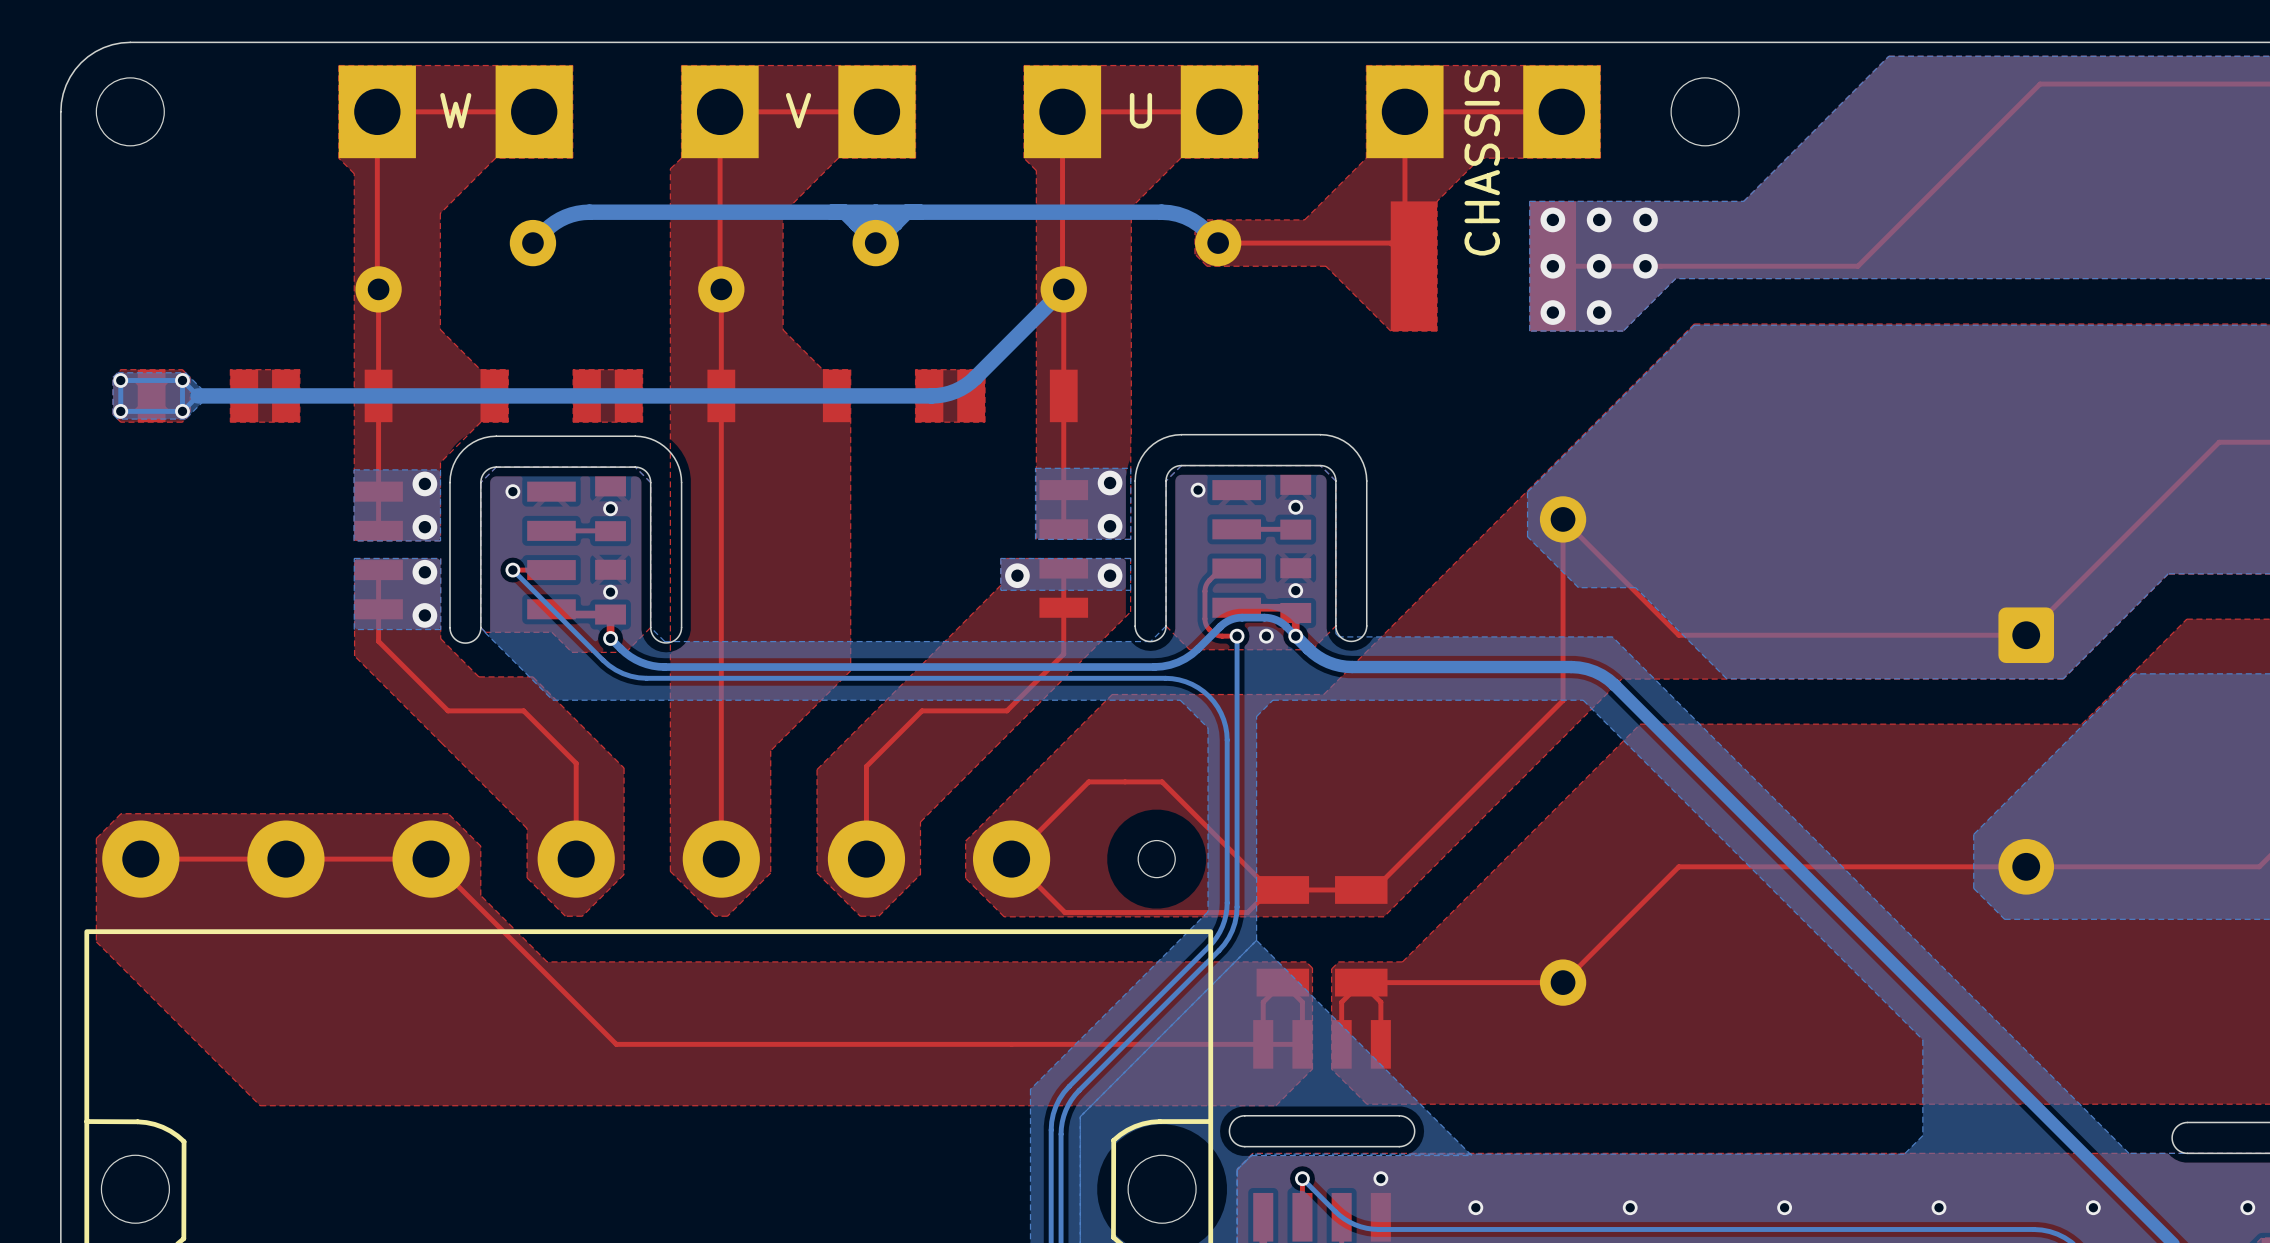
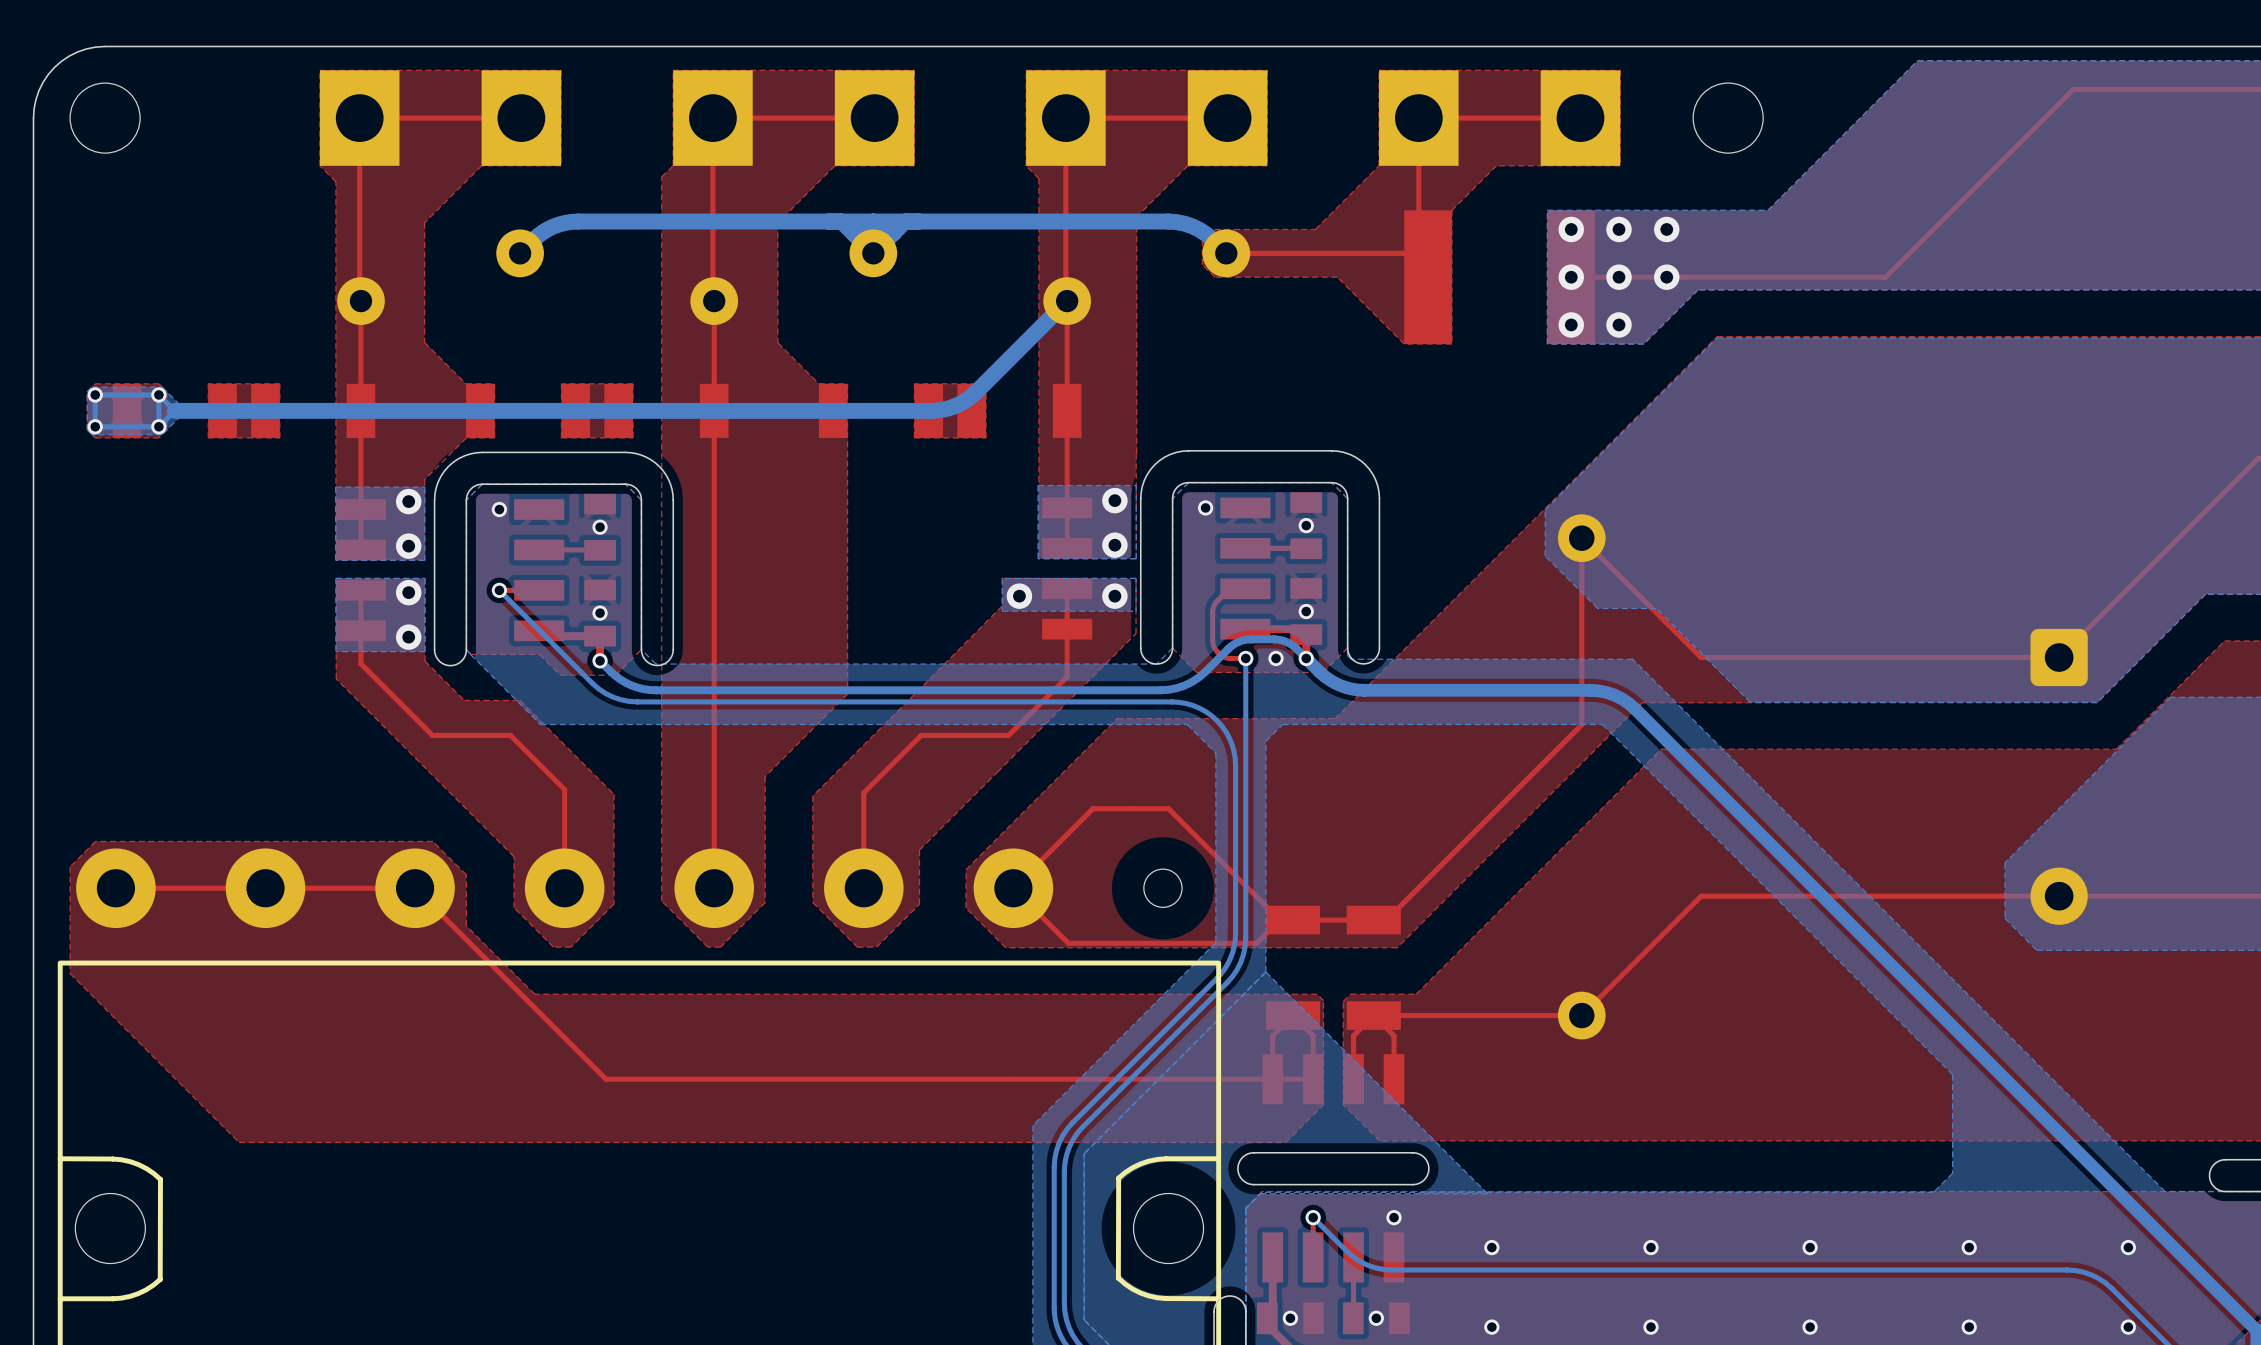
text: W (455, 110) -> none
text: V (798, 110) -> none
text: U (1140, 110) -> none
text: CHASSIS (1482, 162) -> none

